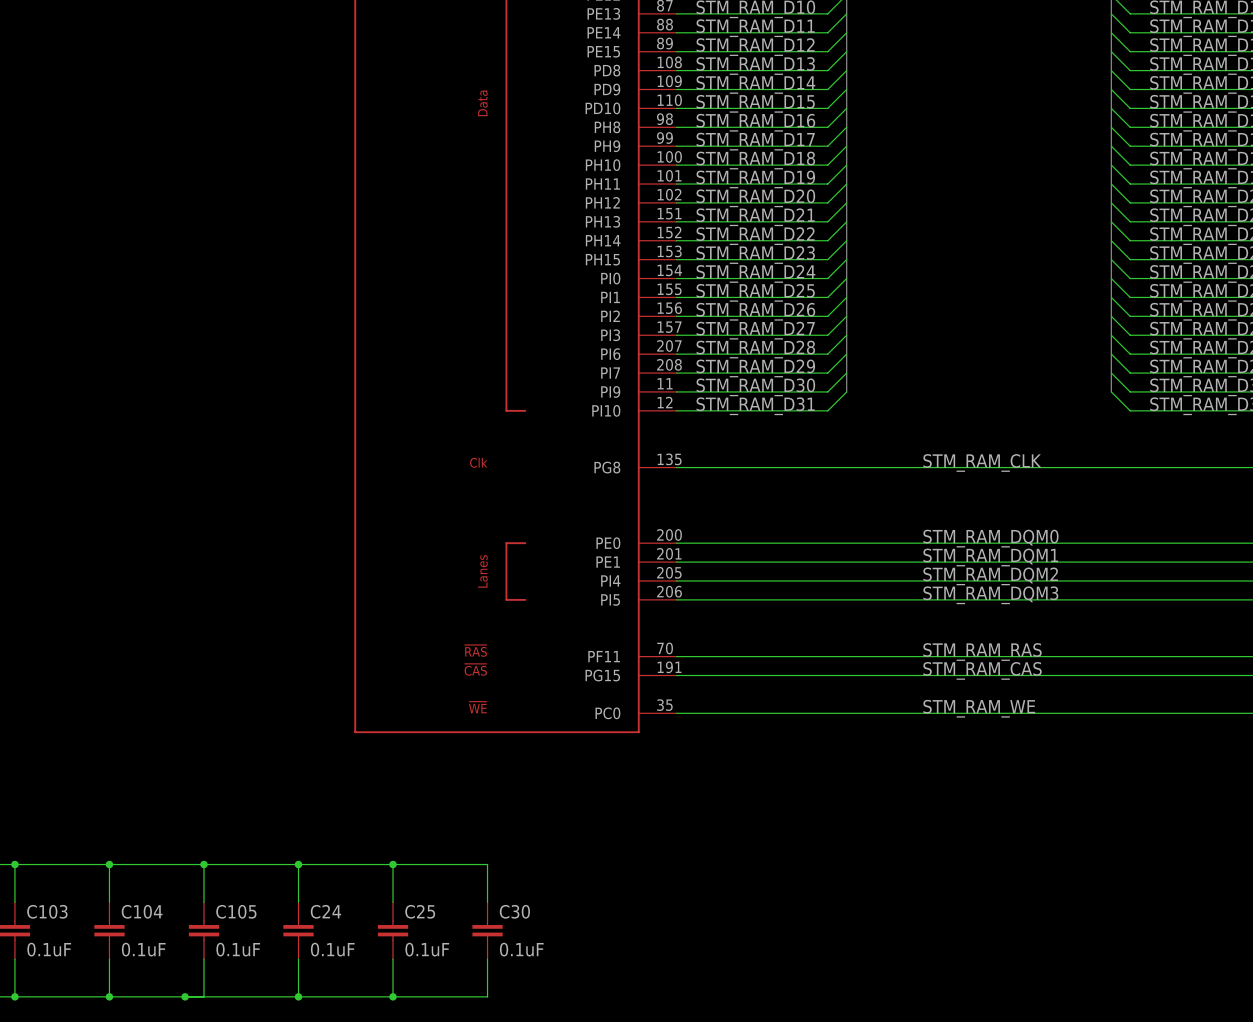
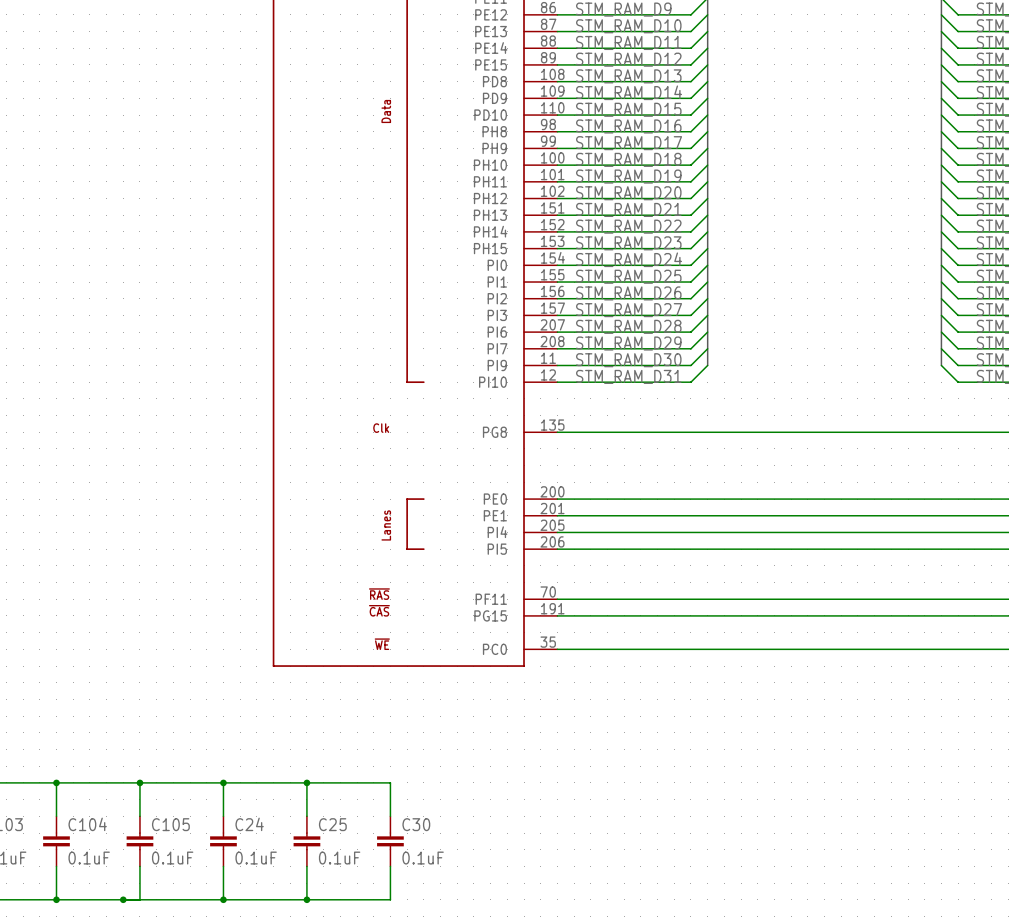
label: STM_RAM_CLK (982, 462) -> none
label: STM_RAM_DQM0 (990, 538) -> none
label: STM_RAM_DQM1 (990, 557) -> none
label: STM_RAM_DQM2 (990, 576) -> none
label: STM_RAM_DQM3 (990, 595) -> none
label: STM_RAM_RAS (982, 652) -> none
label: STM_RAM_CAS (982, 670) -> none
label: STM_RAM_WE (979, 708) -> none

